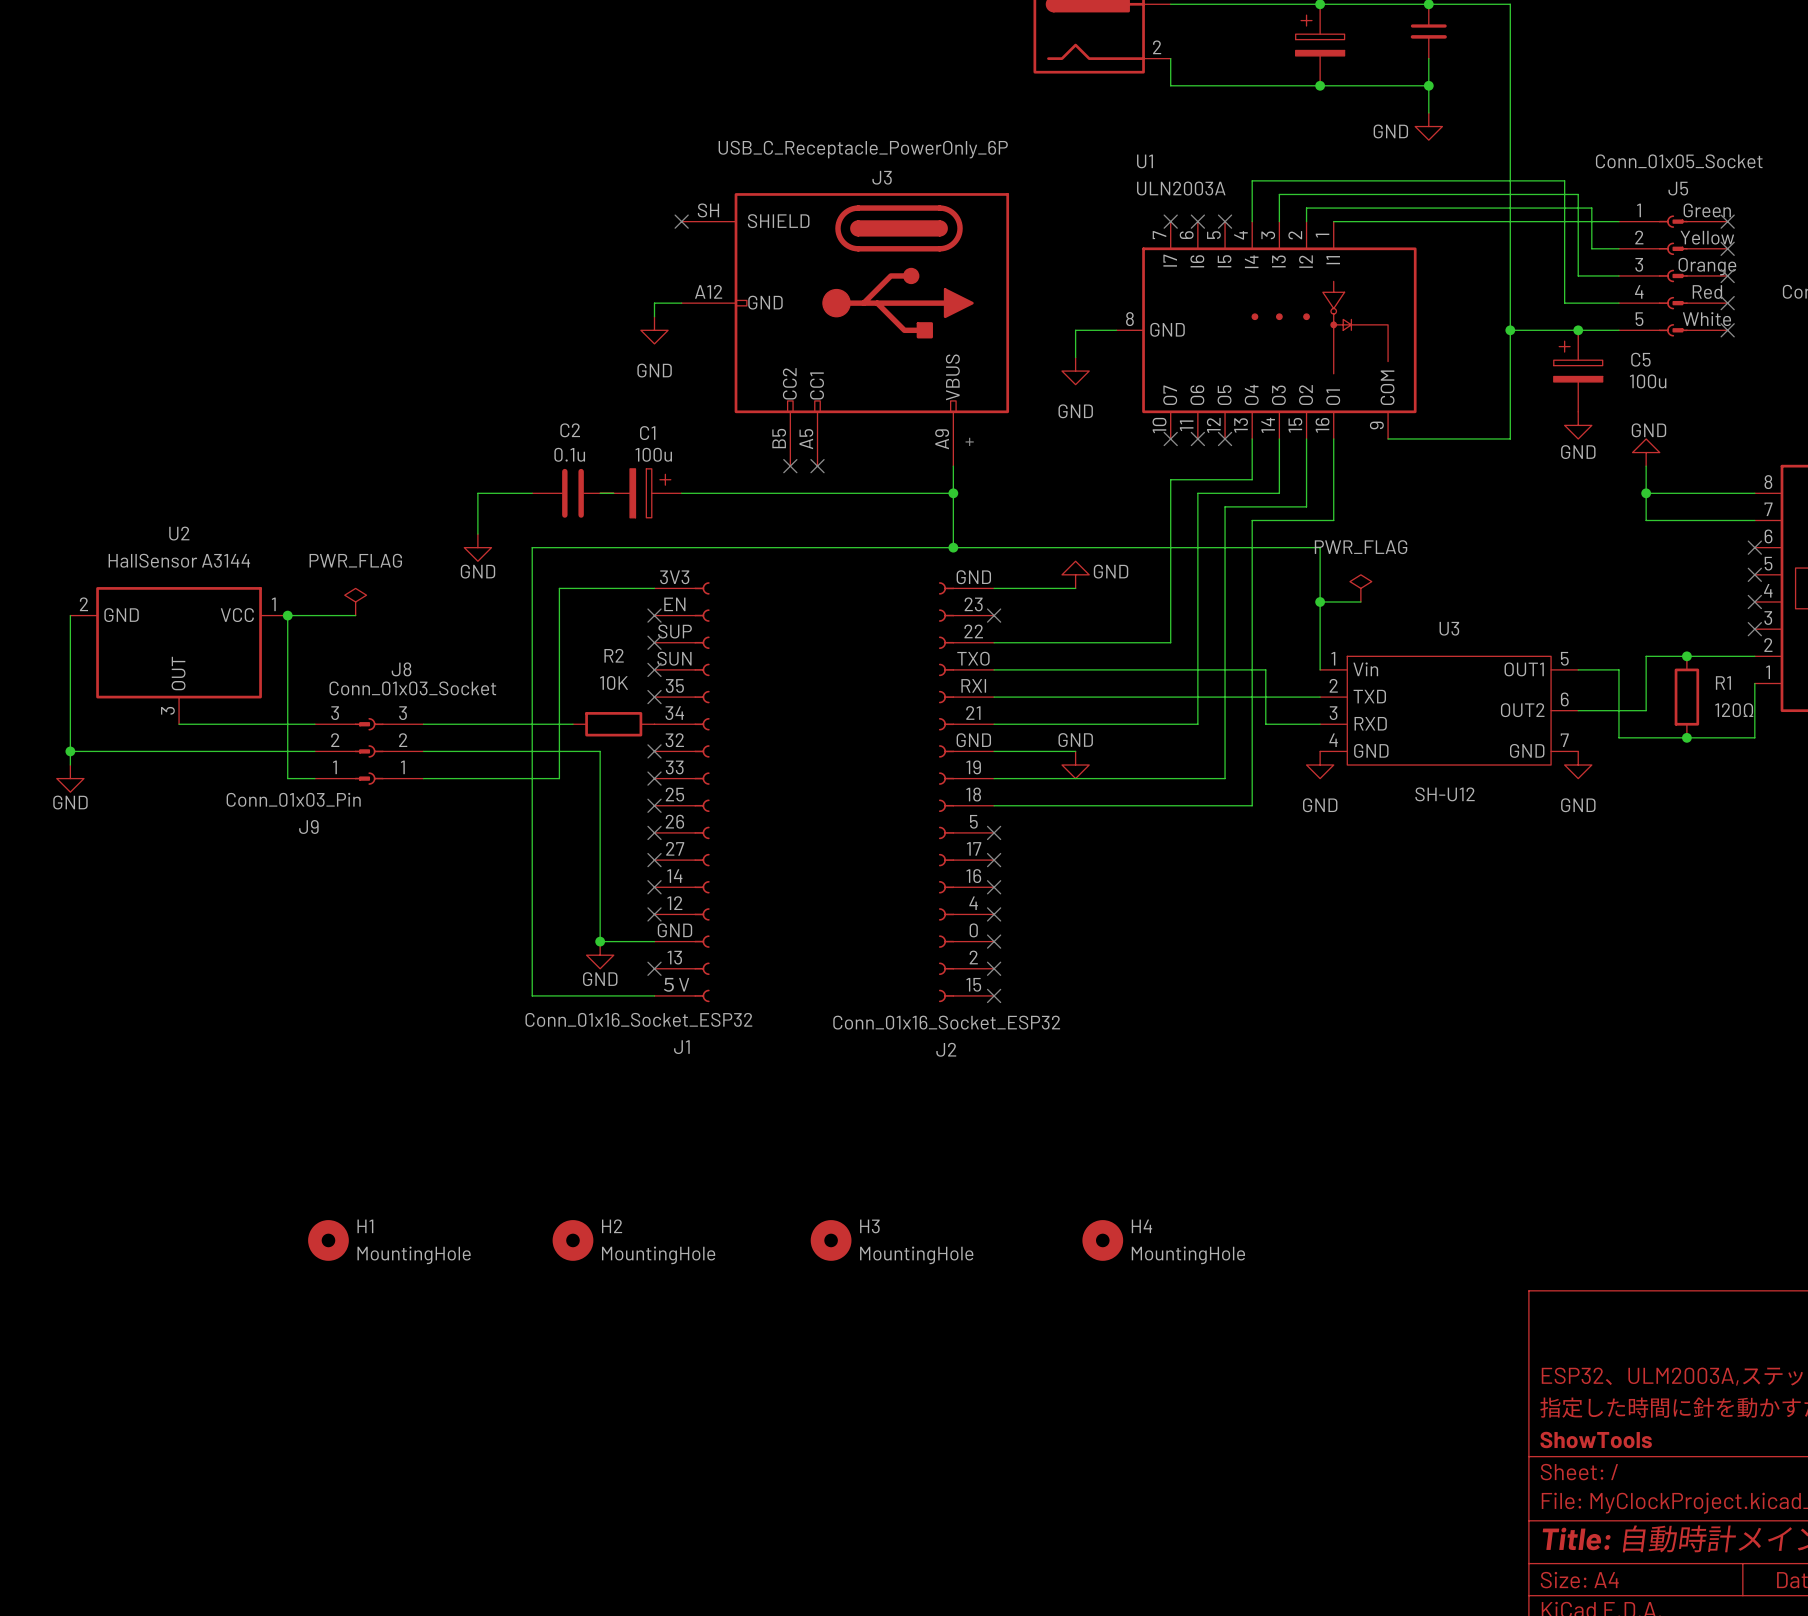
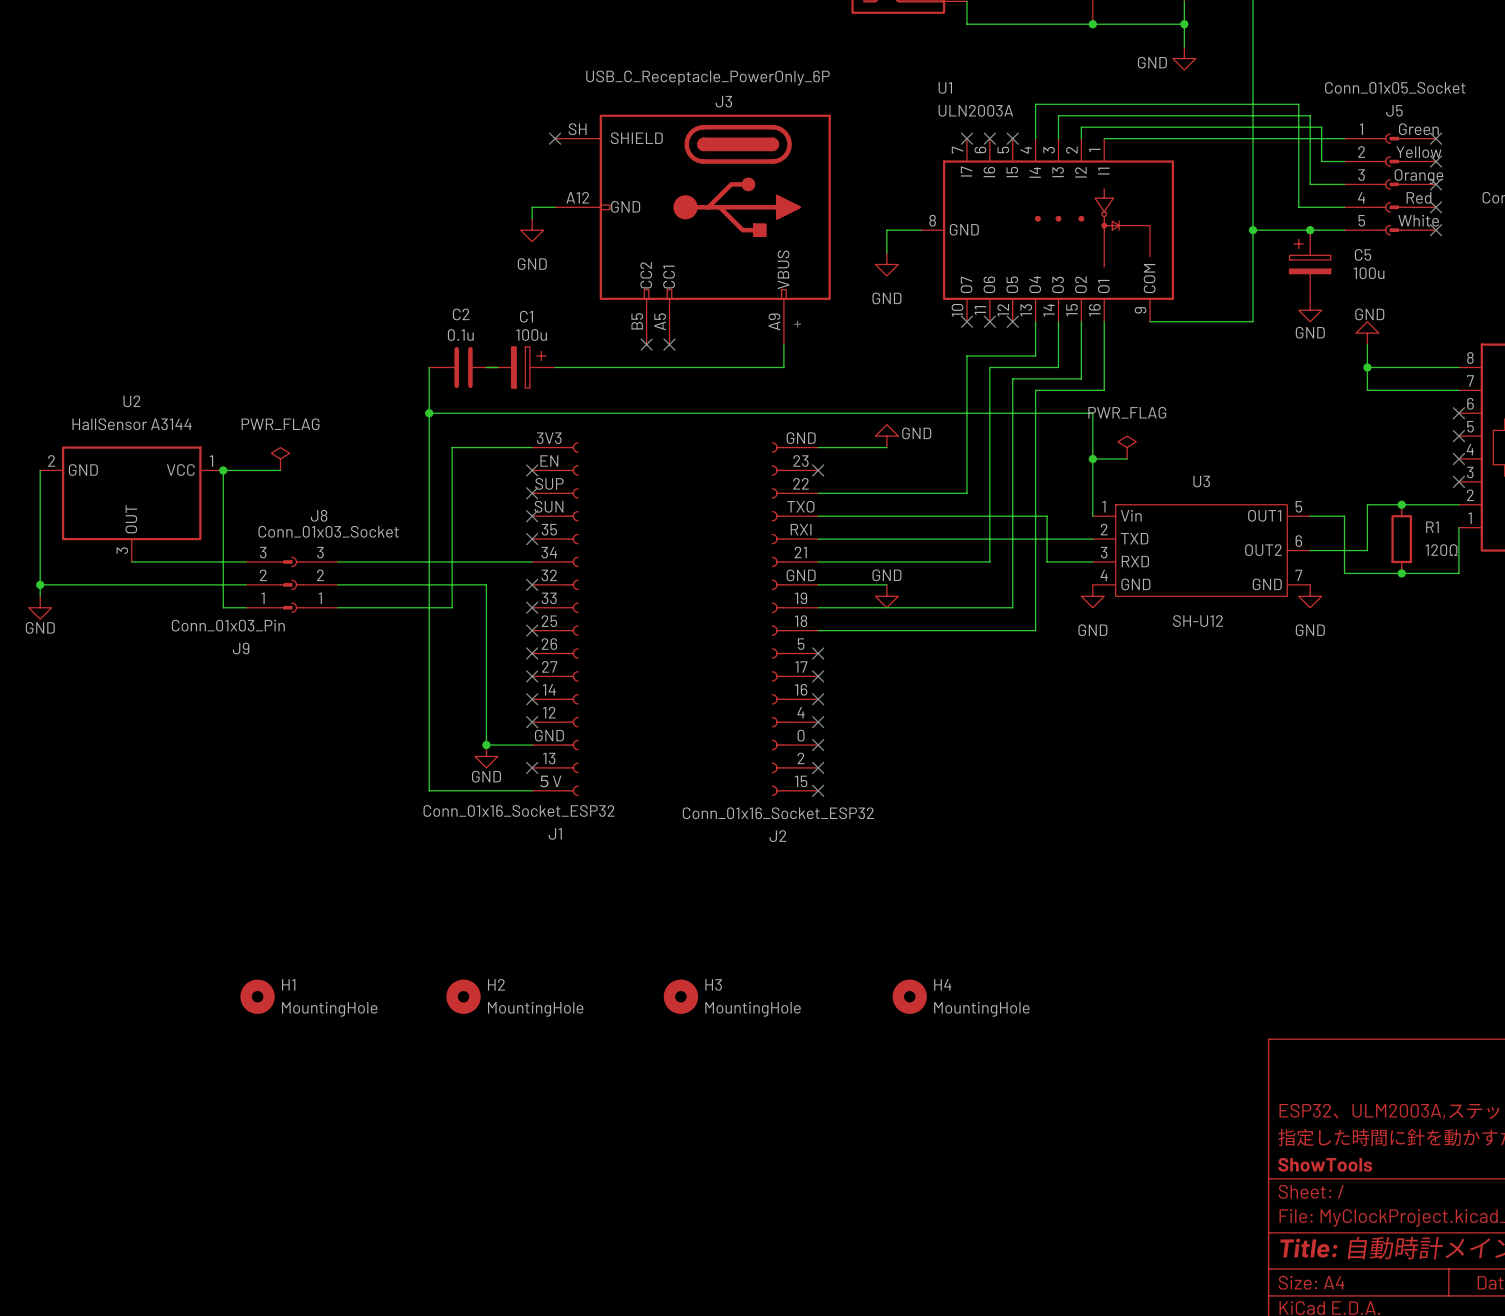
wire: (532, 493) (477, 493) (477, 534) -> (429, 367) (429, 413)
wire: (953, 493) (953, 547) -> none
junction: (953, 493) -> none
power symbol: GND (477, 547) -> none
junction: none -> (429, 413)
junction: (953, 547) -> none
wire: none -> (463, 561) (532, 561)
R2: 10K (613, 724) -> none

